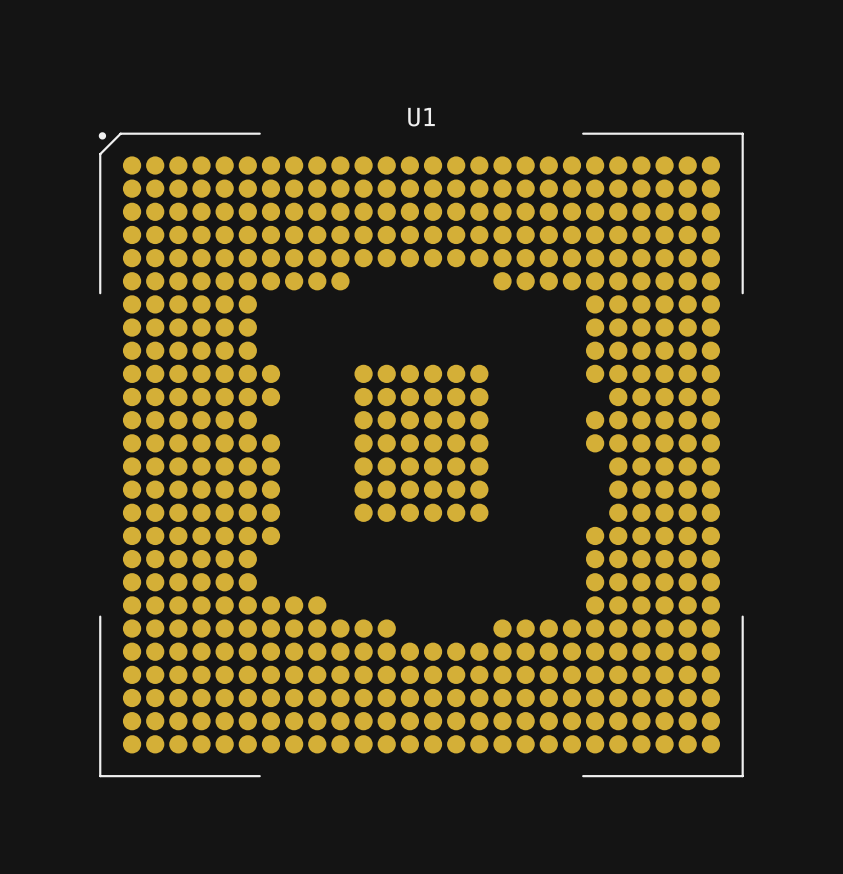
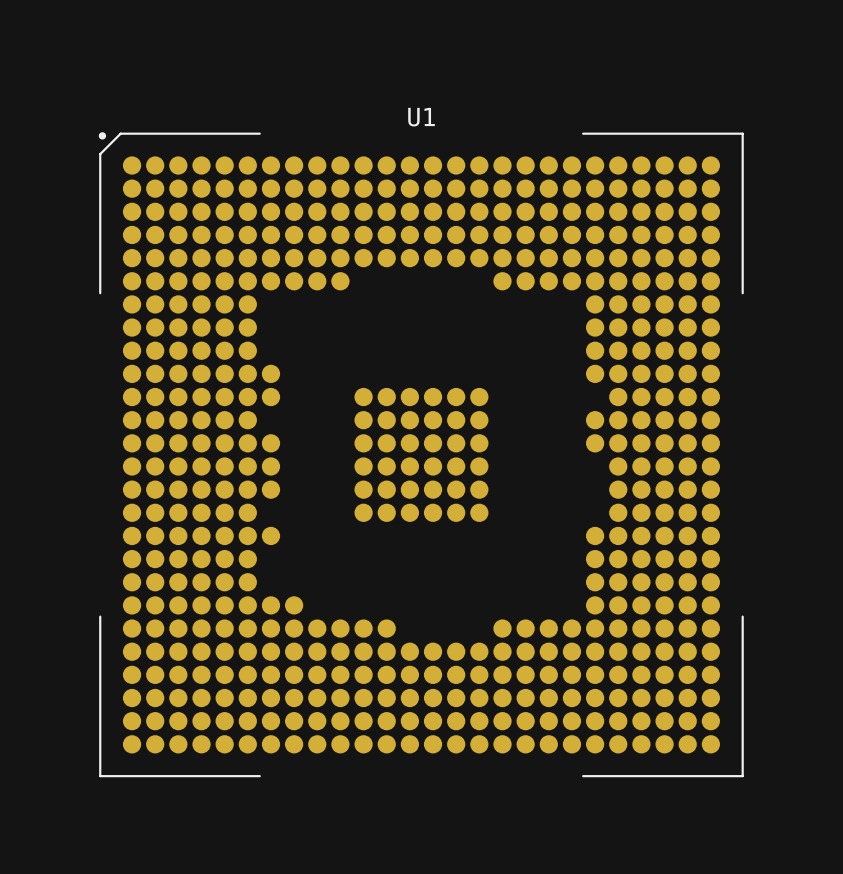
U1 footprint: [98, 132, 744, 778] -> [98, 132, 744, 778]

